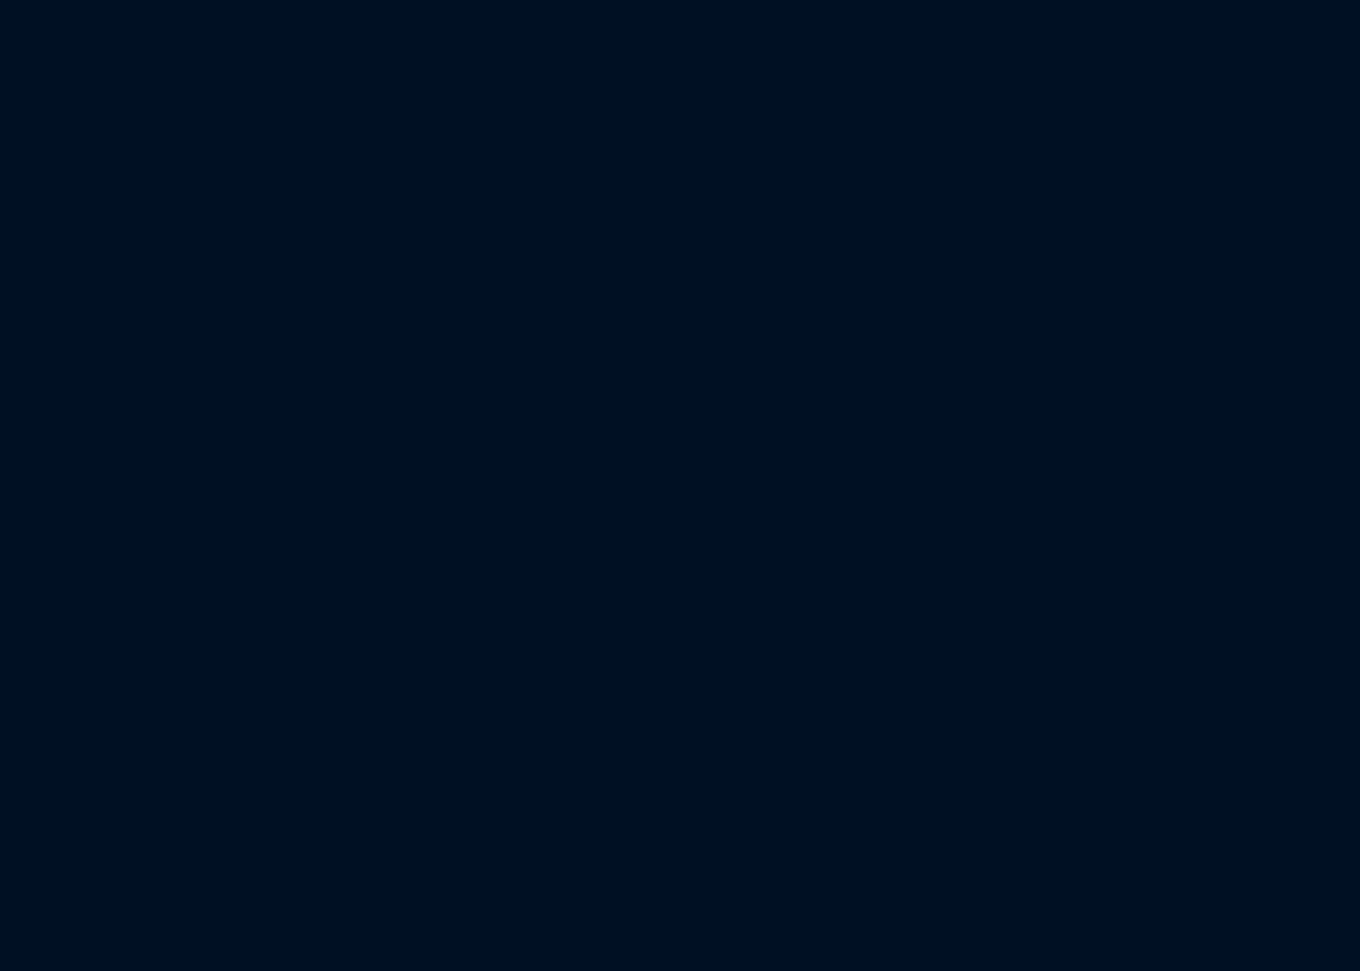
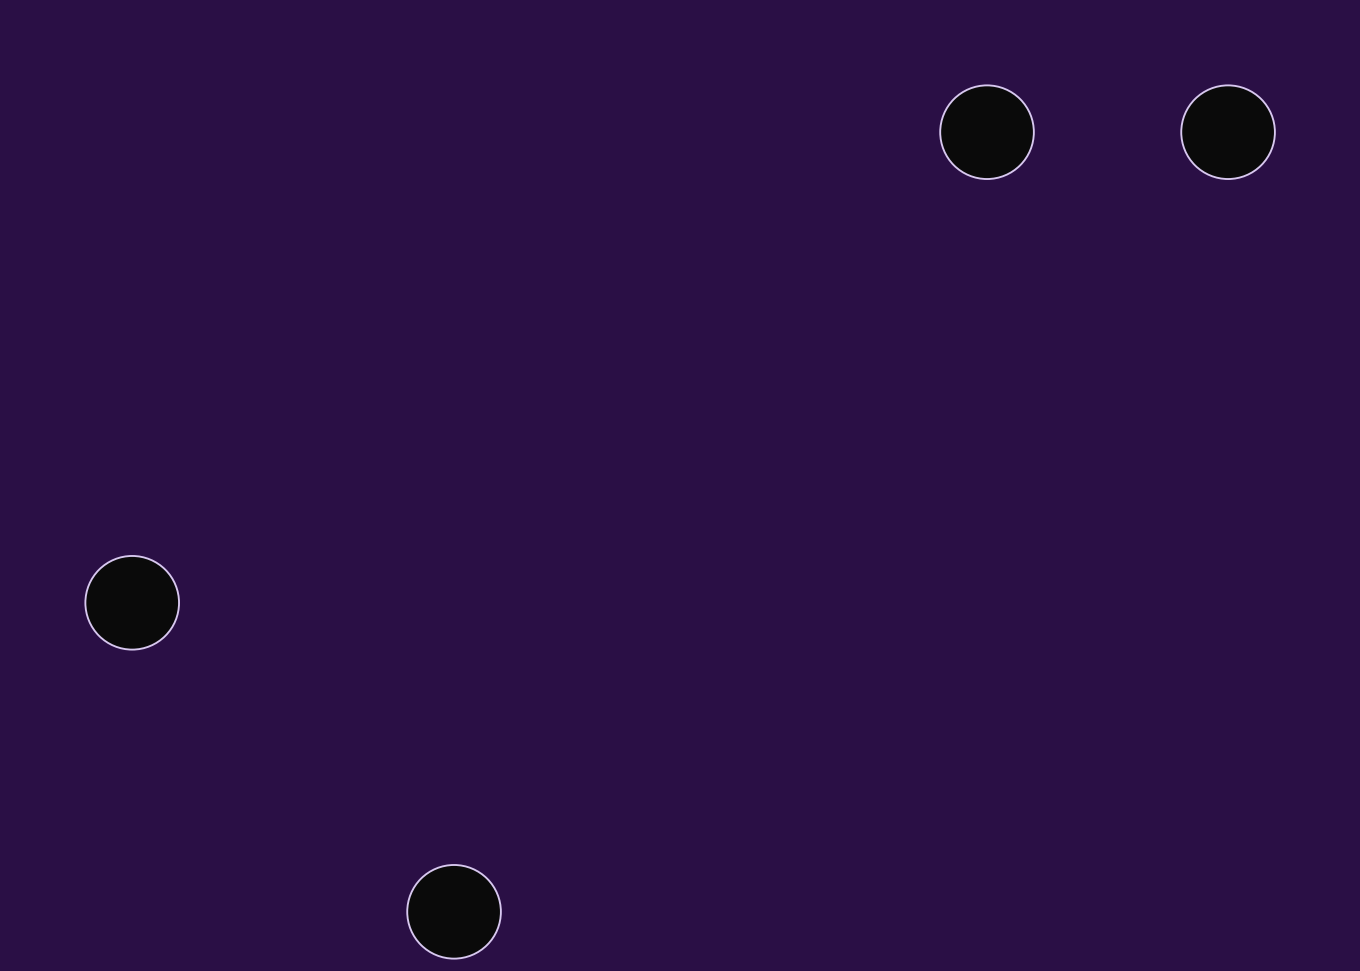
part: none -> (987, 132)
part: none -> (1228, 132)
part: none -> (132, 602)
part: none -> (454, 911)

